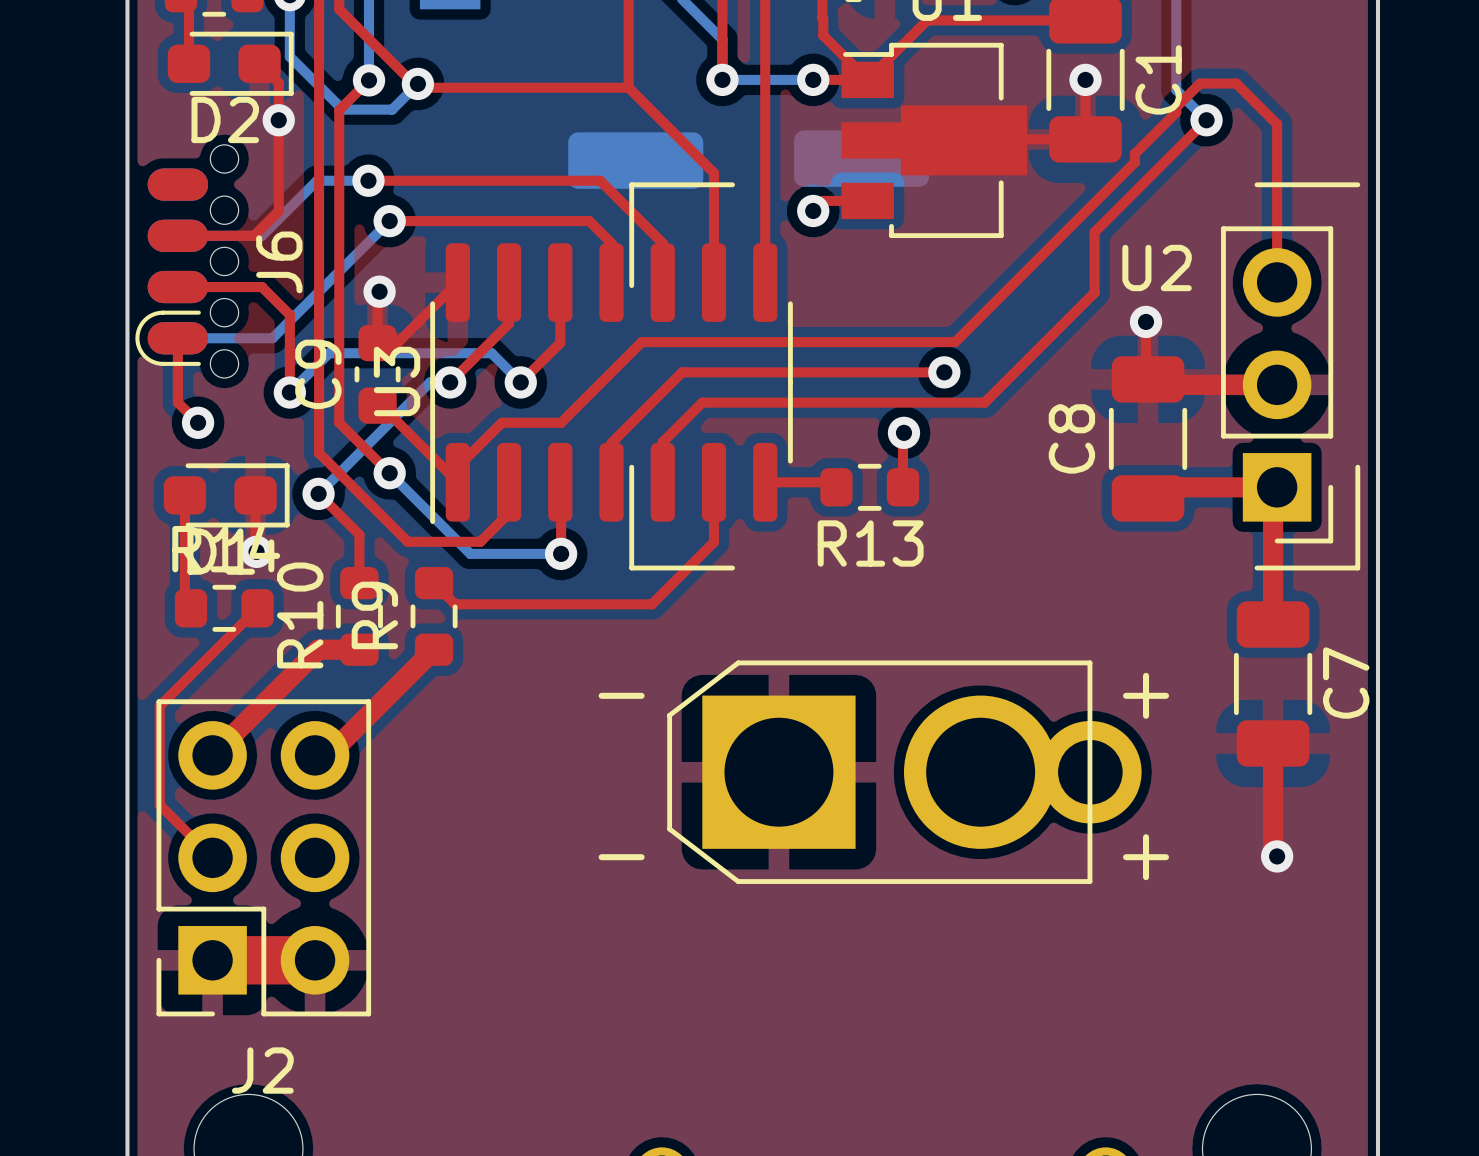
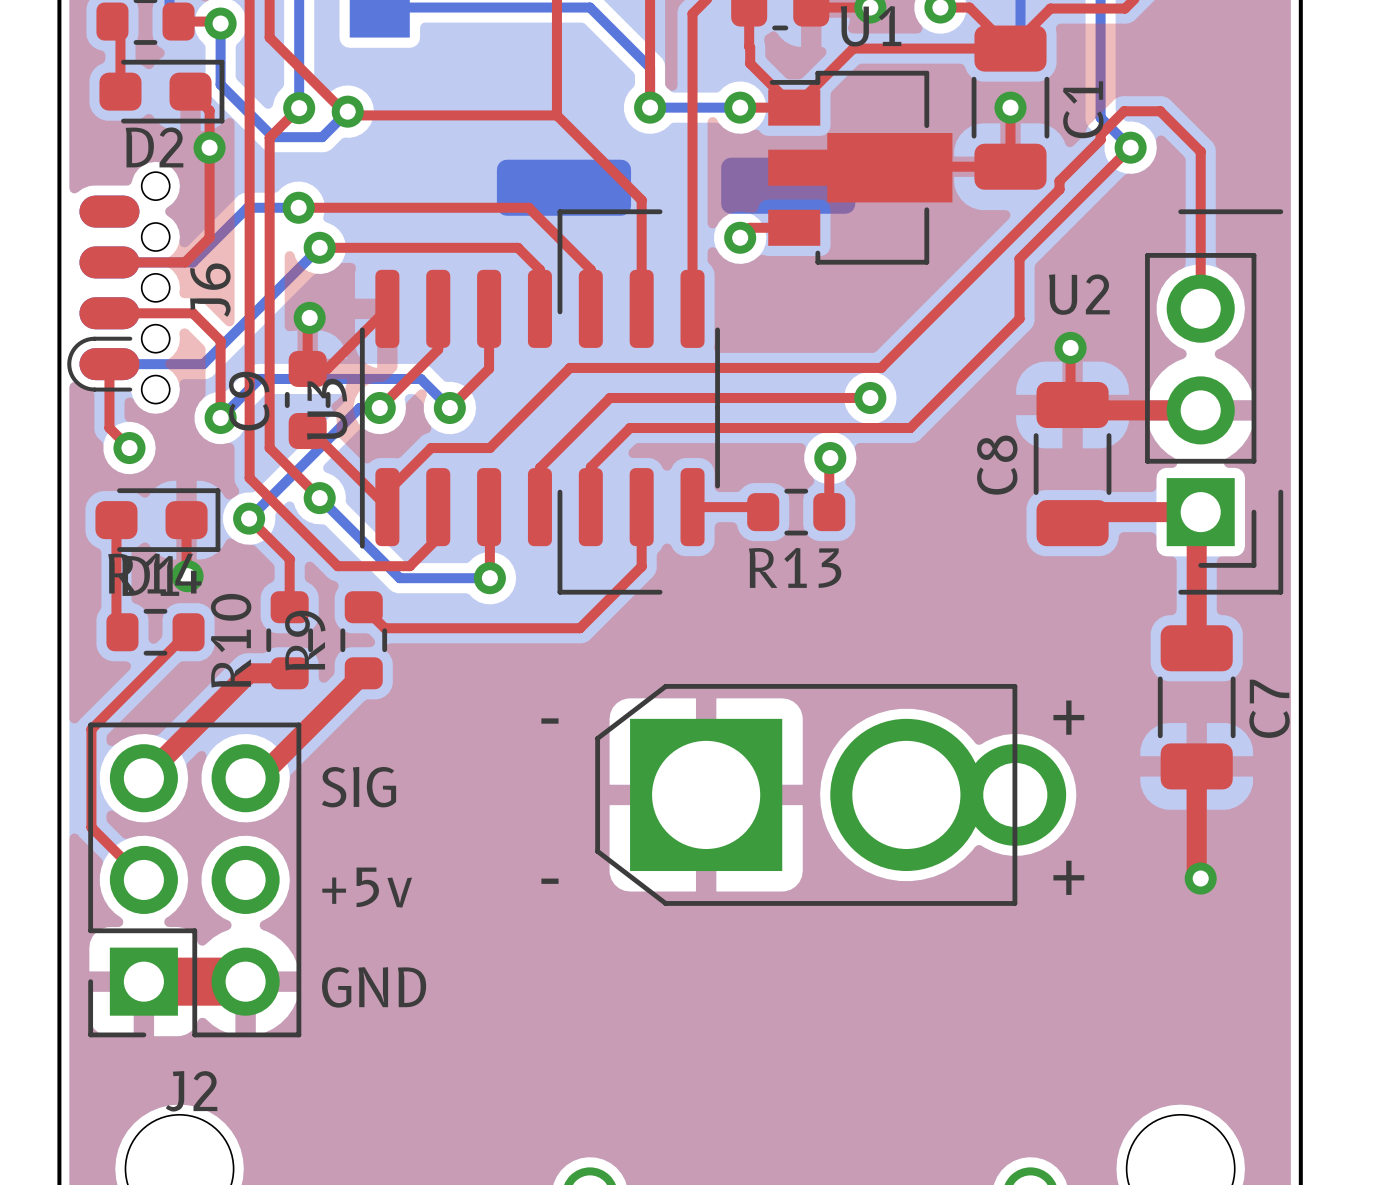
text: none -> SIG (358, 787)
text: none -> +5v (367, 887)
text: none -> GND (374, 987)

